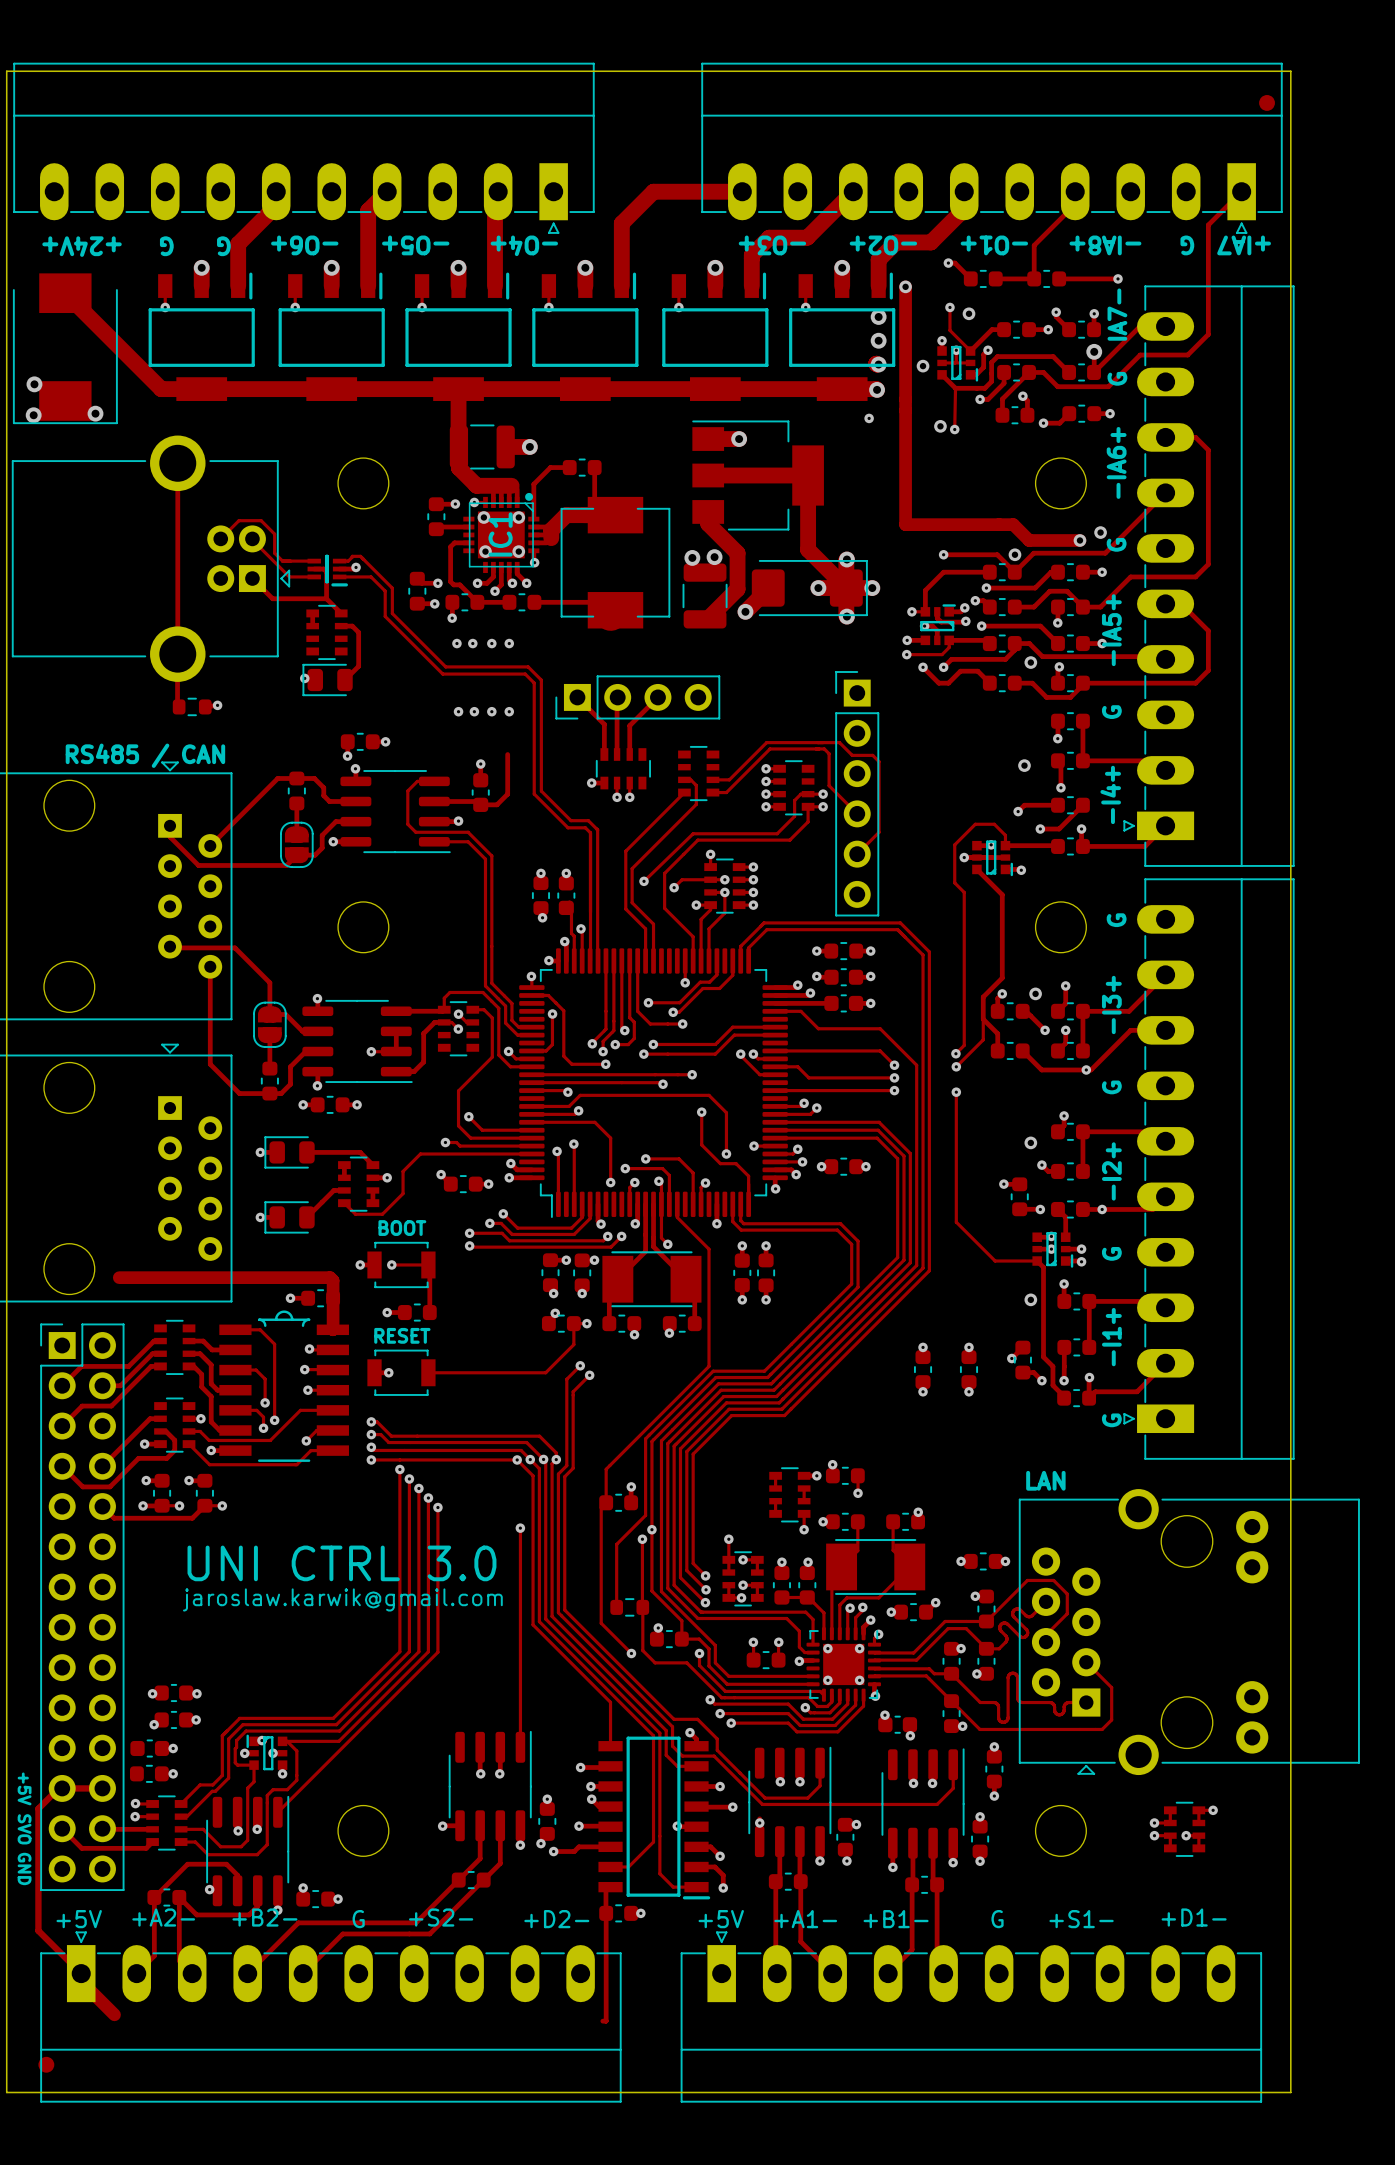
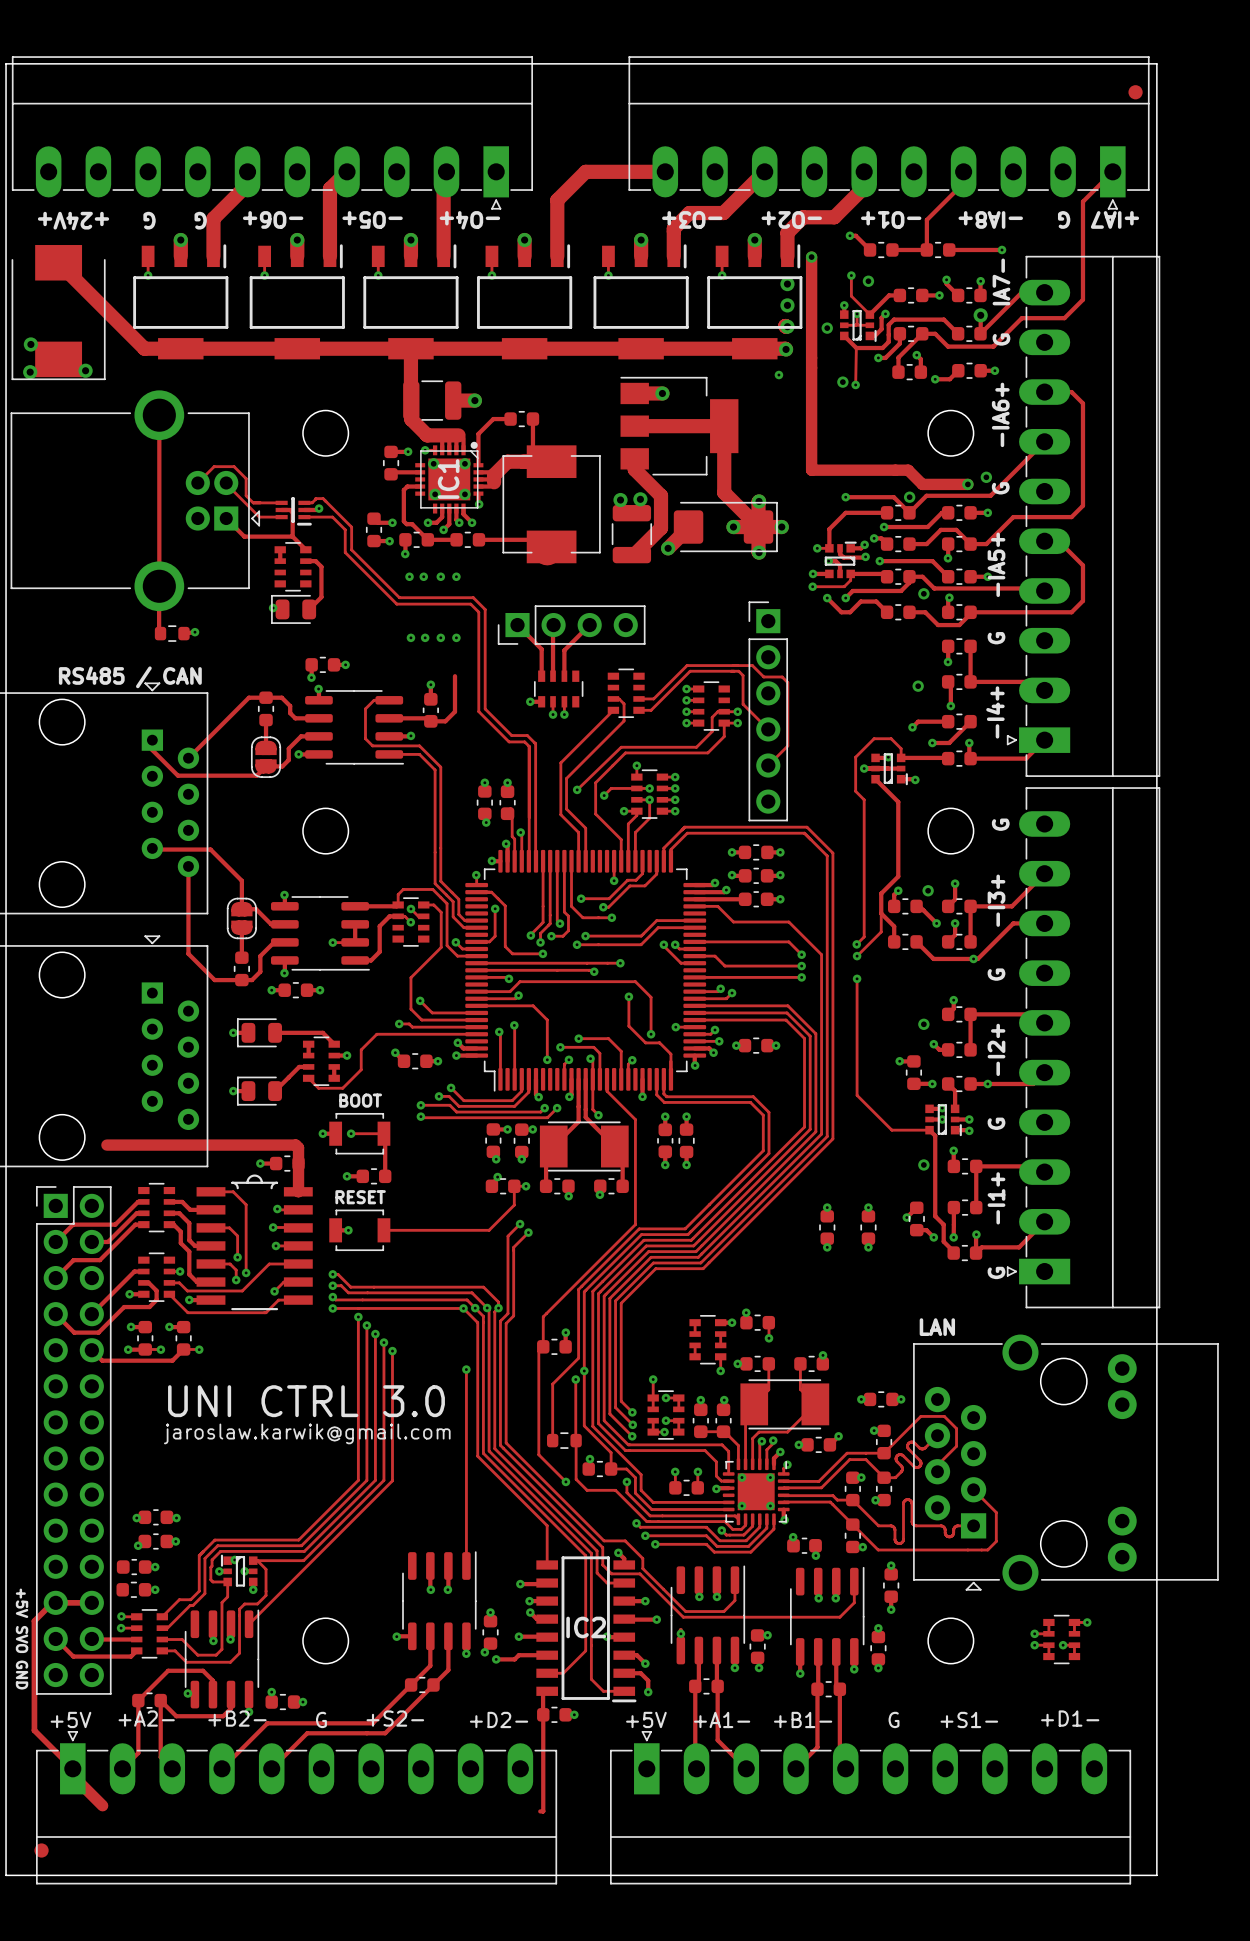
IC2 name: none -> IC2 (586, 1627)

